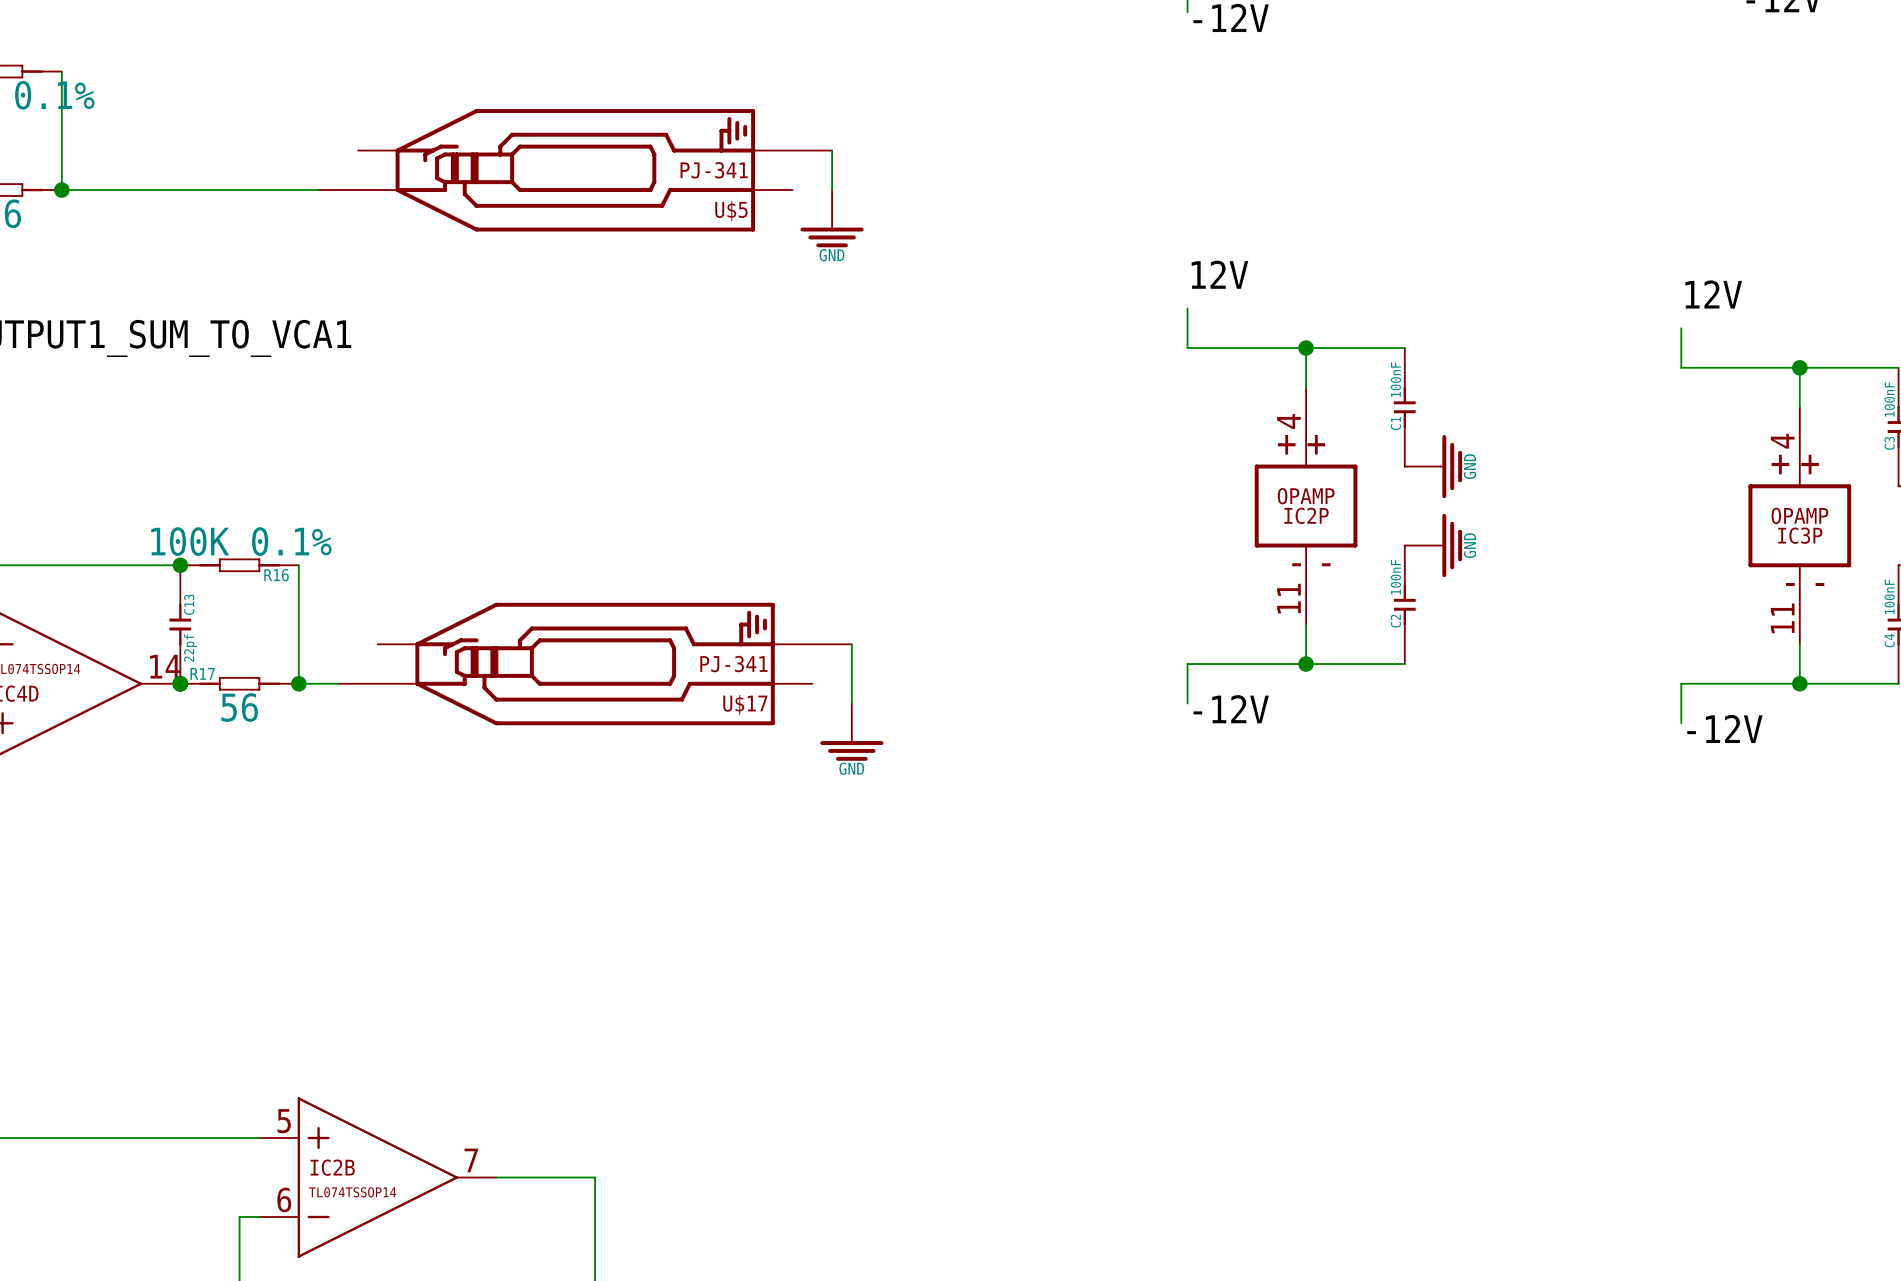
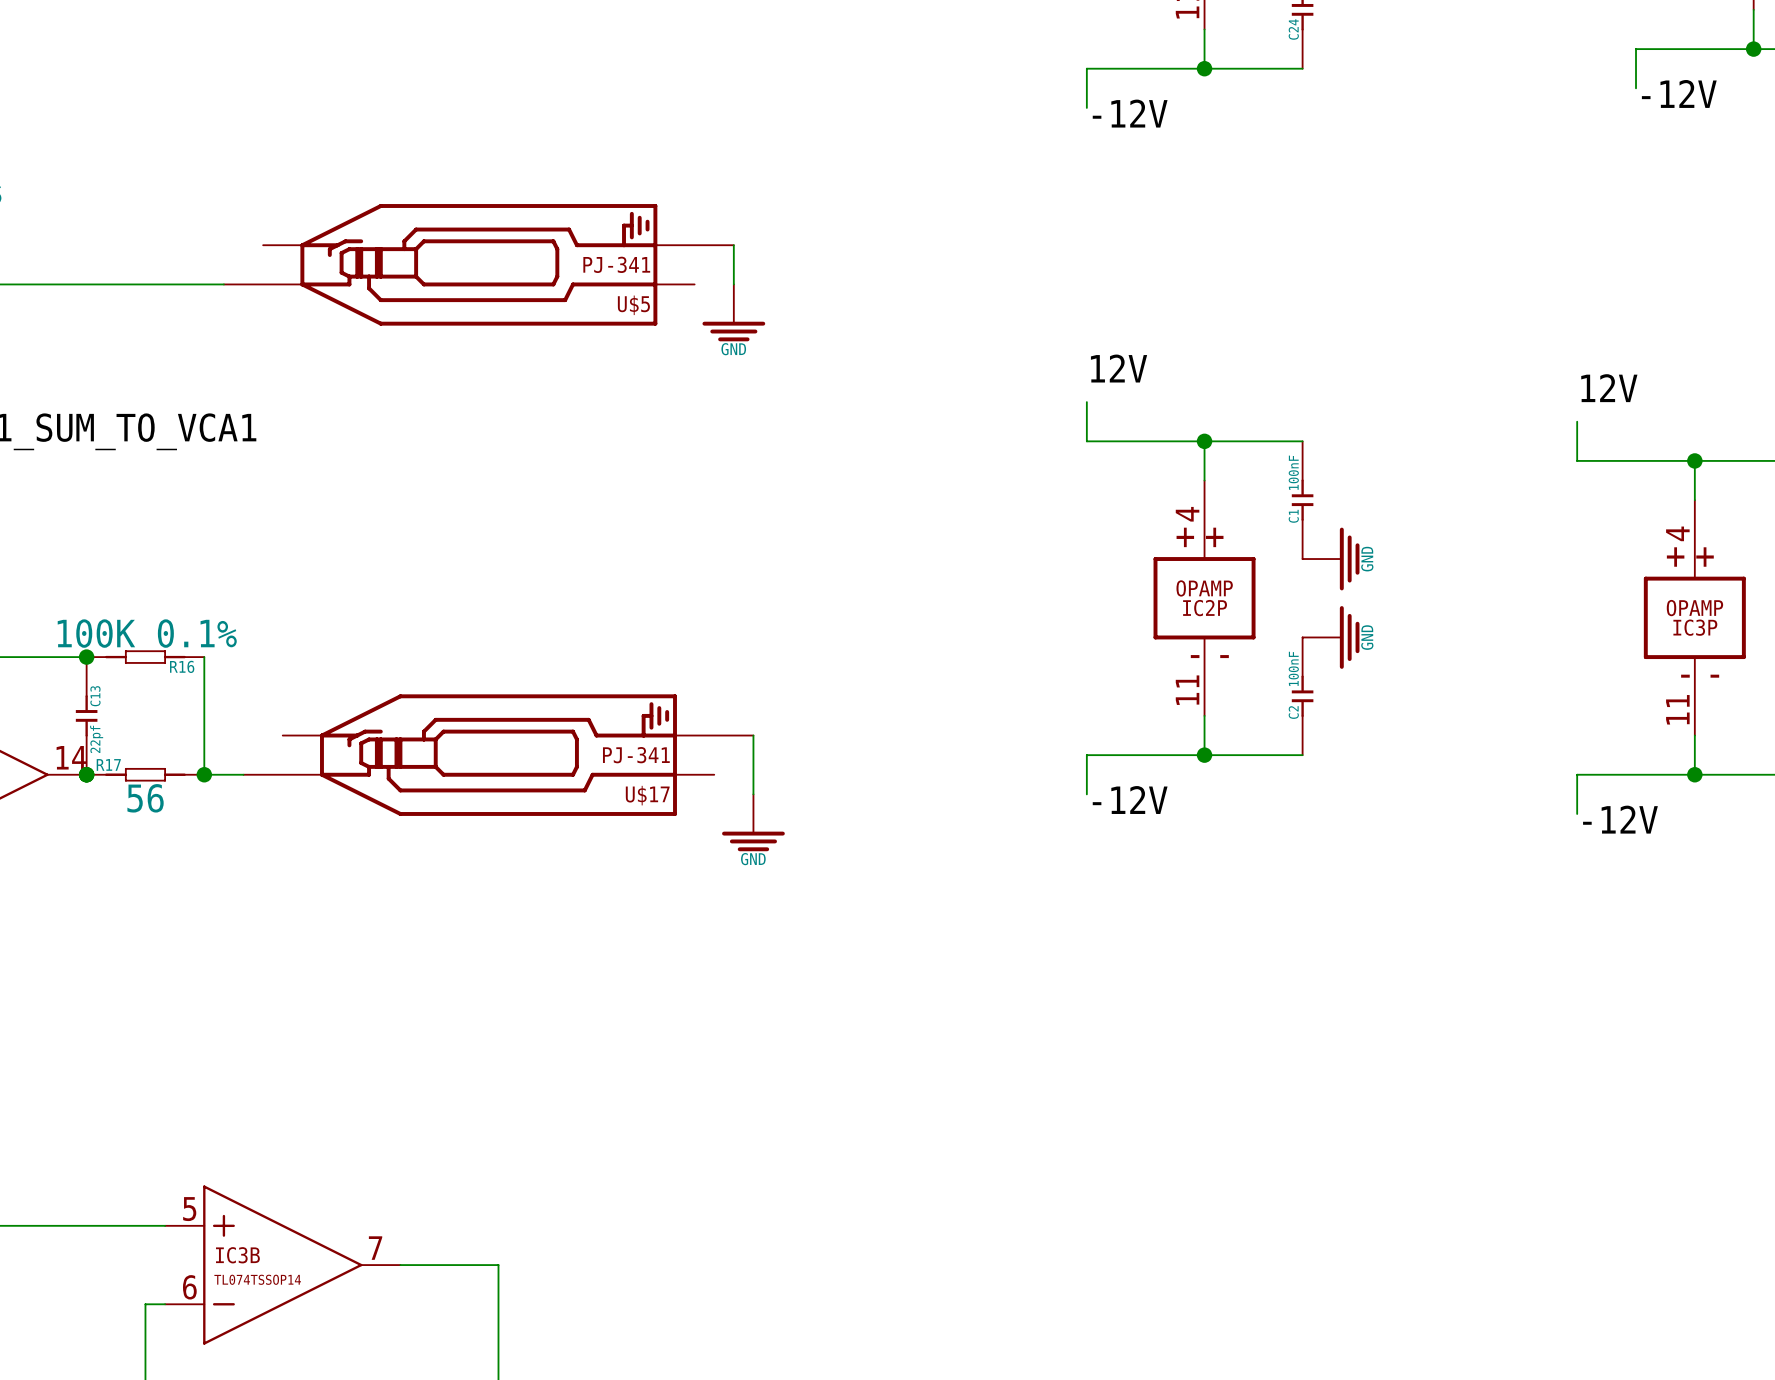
IC2B name: IC2B (332, 1167) -> IC3B (237, 1255)

